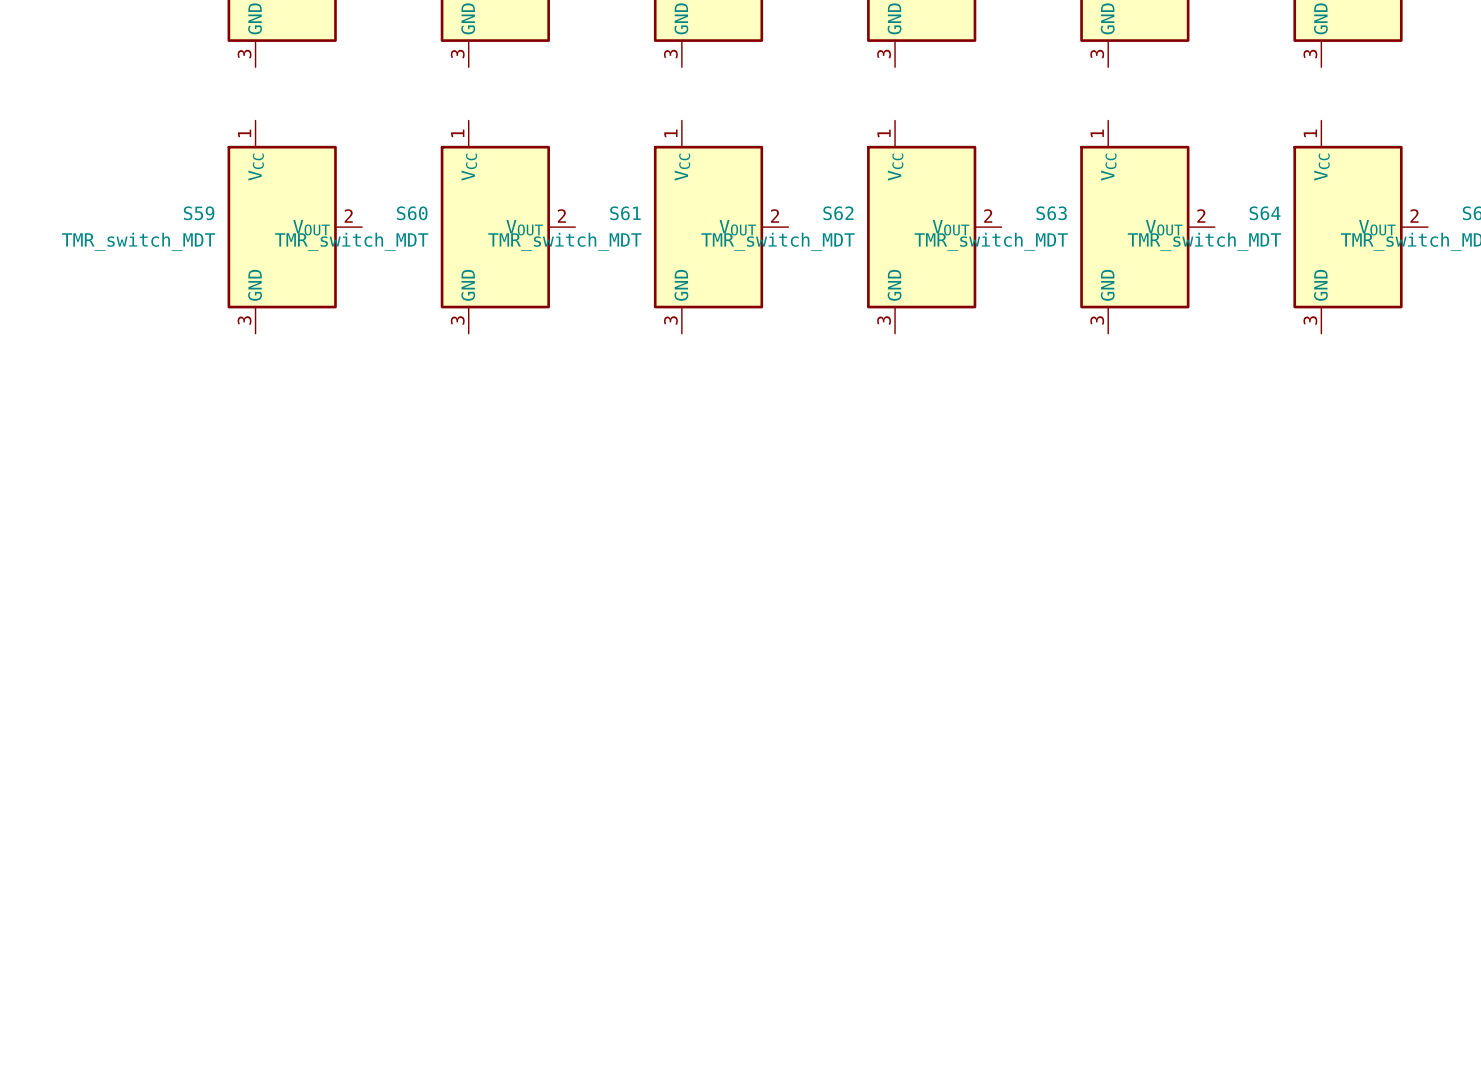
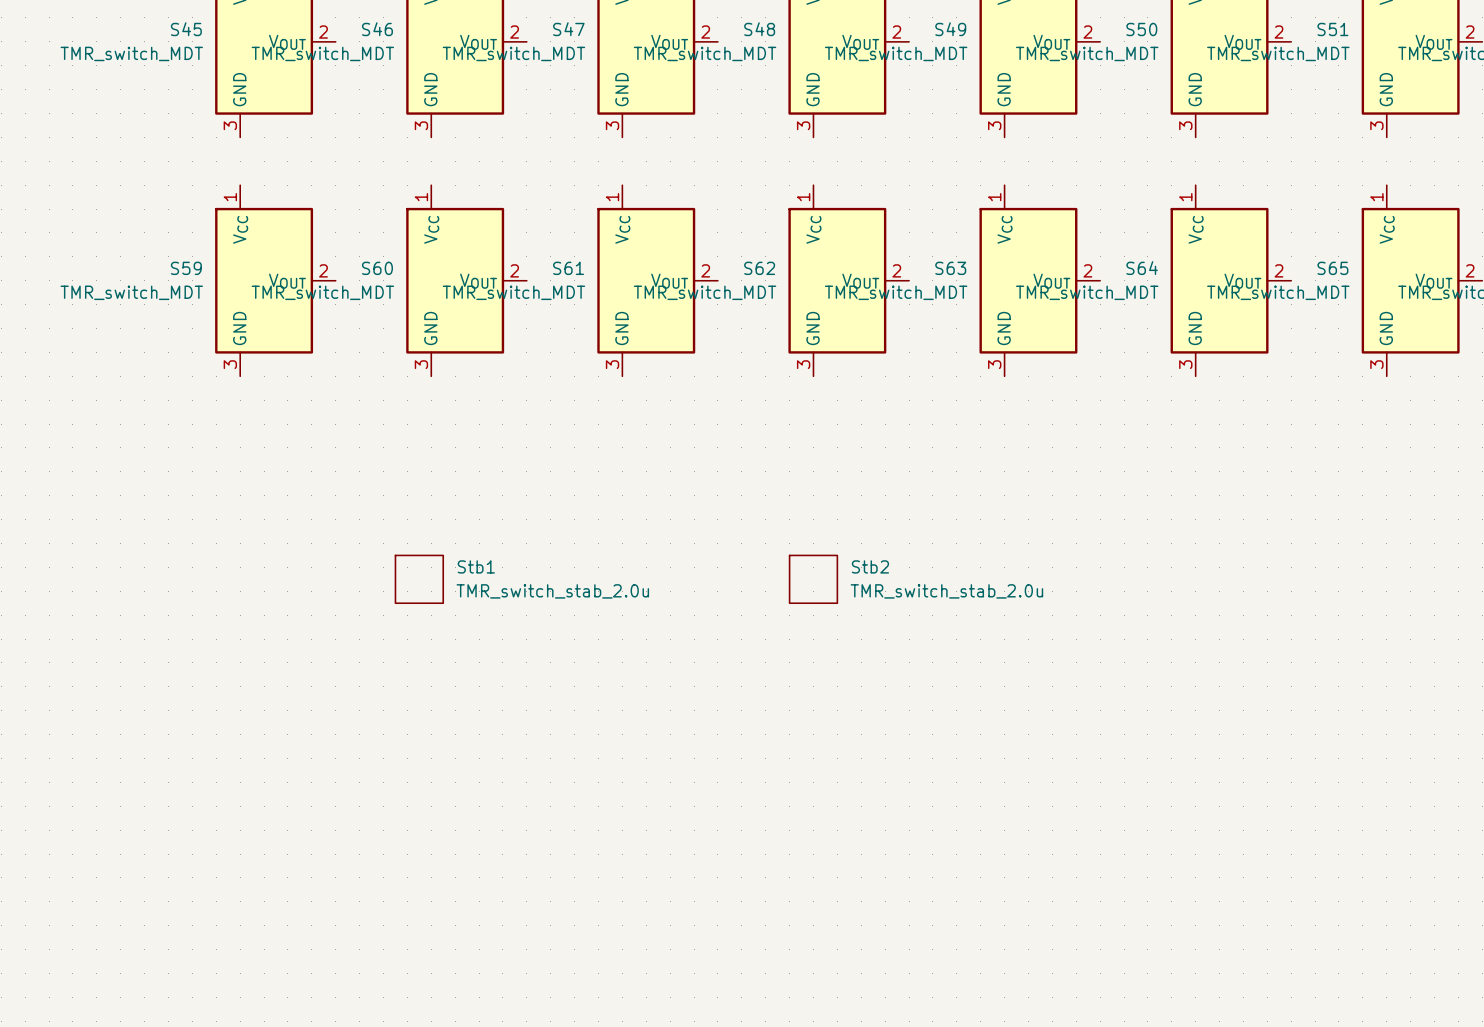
Stb1: none -> TMR_switch_stab_2.0u (419, 579)
Stb2: none -> TMR_switch_stab_2.0u (813, 579)

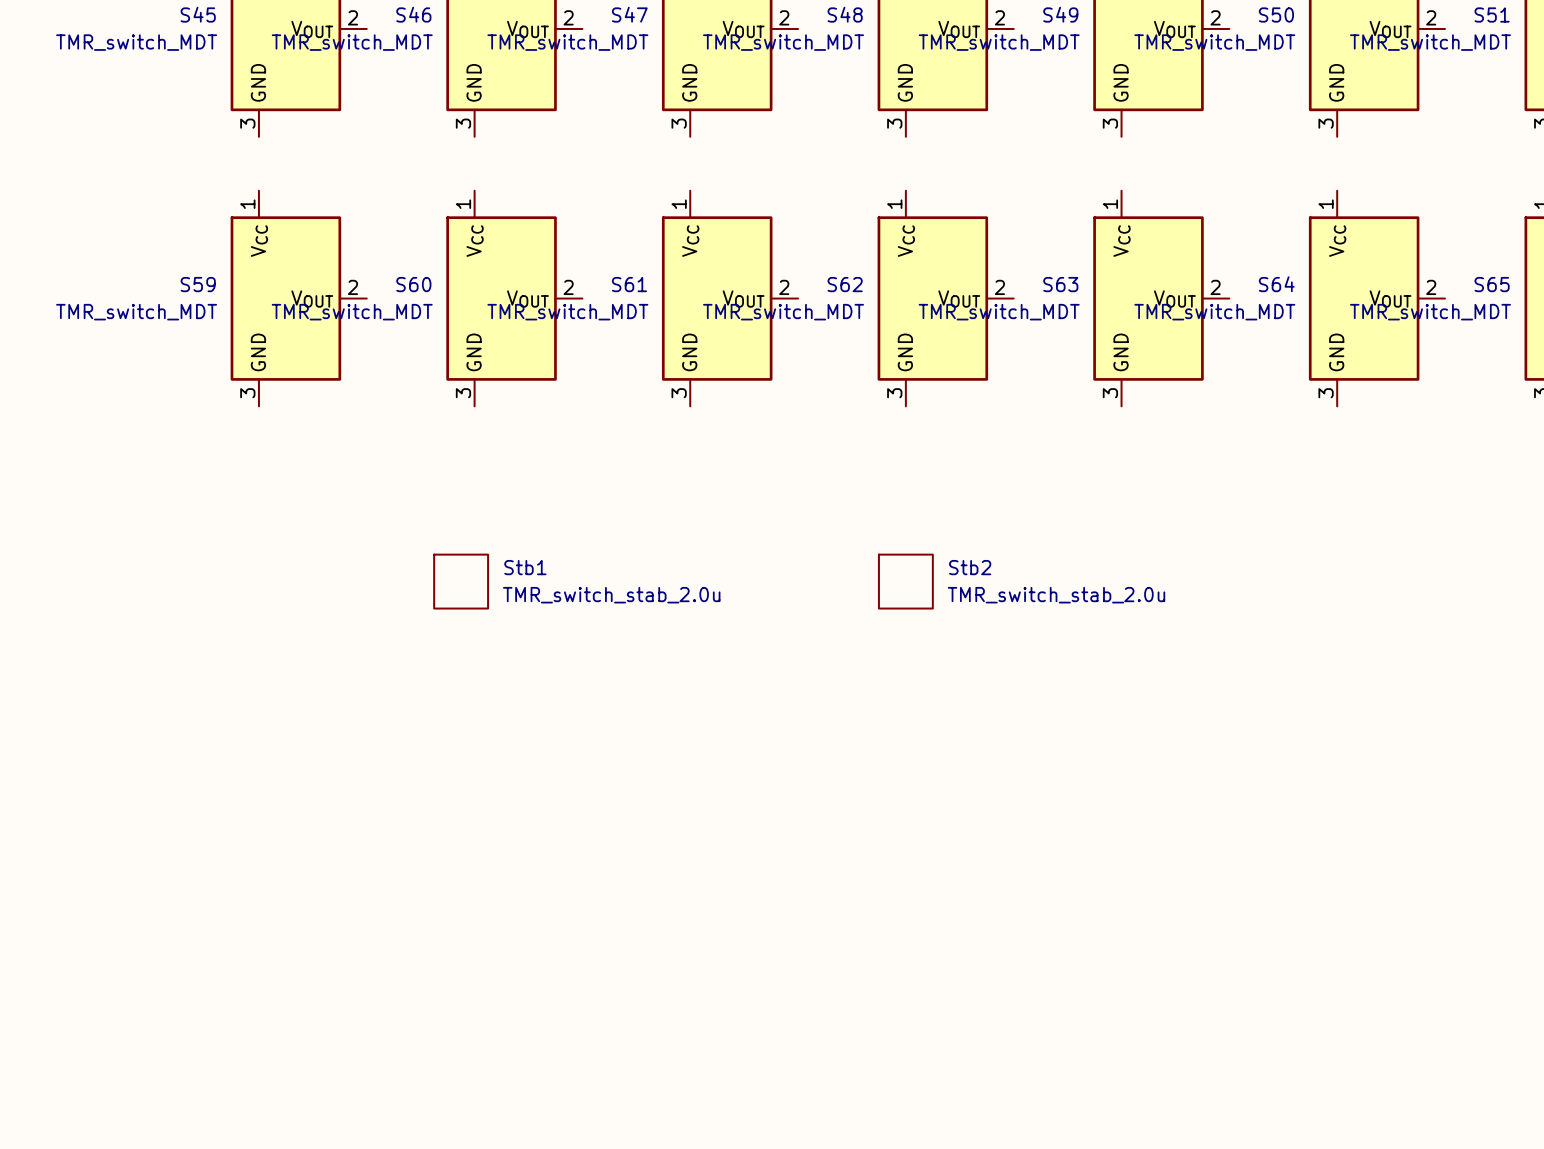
Stb1 position: (419, 579) -> (461, 581)
Stb2 position: (813, 579) -> (905, 581)

